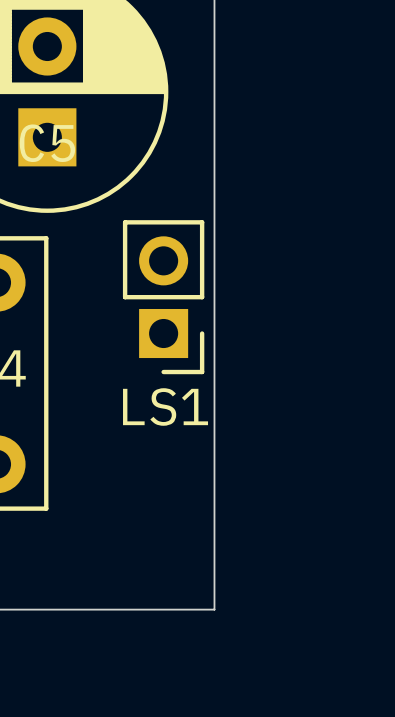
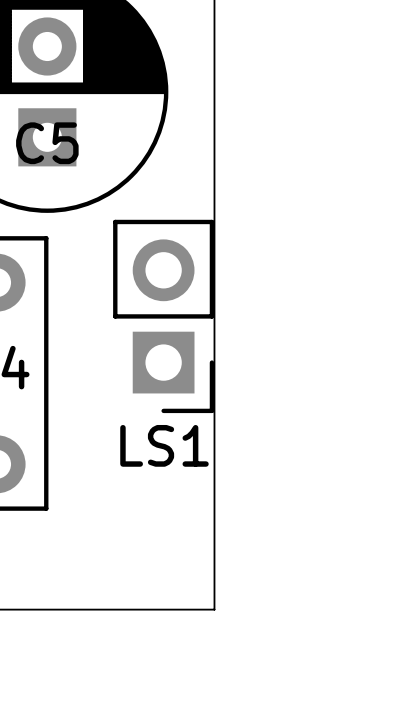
LS1 footprint: [122, 220, 205, 375] -> [113, 219, 215, 414]

